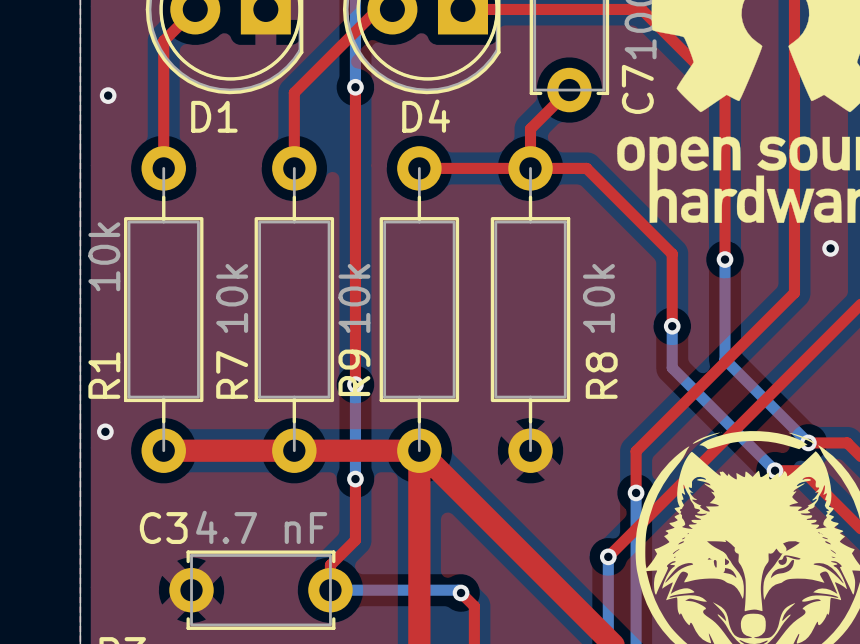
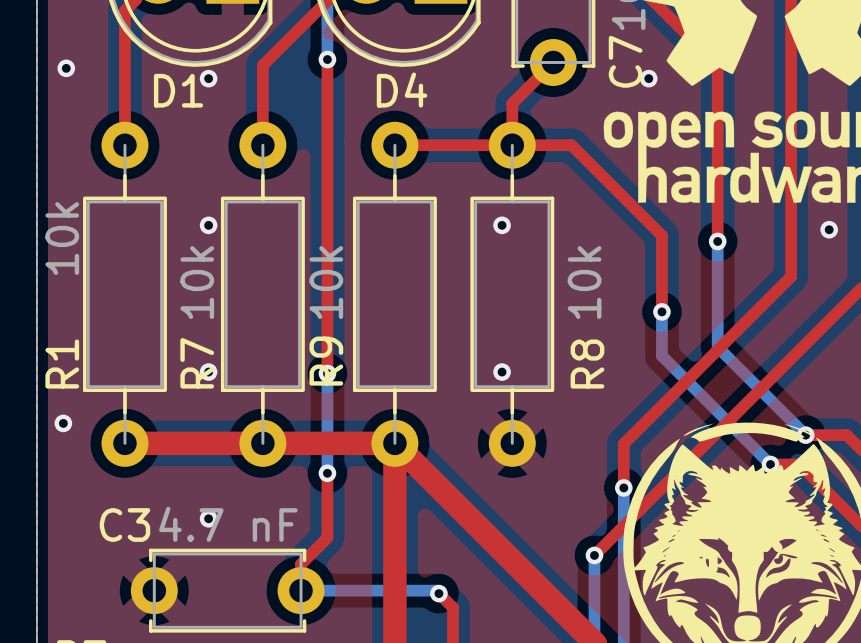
via: none -> (208, 78)
via: none -> (648, 78)
via: none -> (208, 225)
via: none -> (502, 225)
via: none -> (208, 372)
via: none -> (502, 372)
via: none -> (208, 518)

